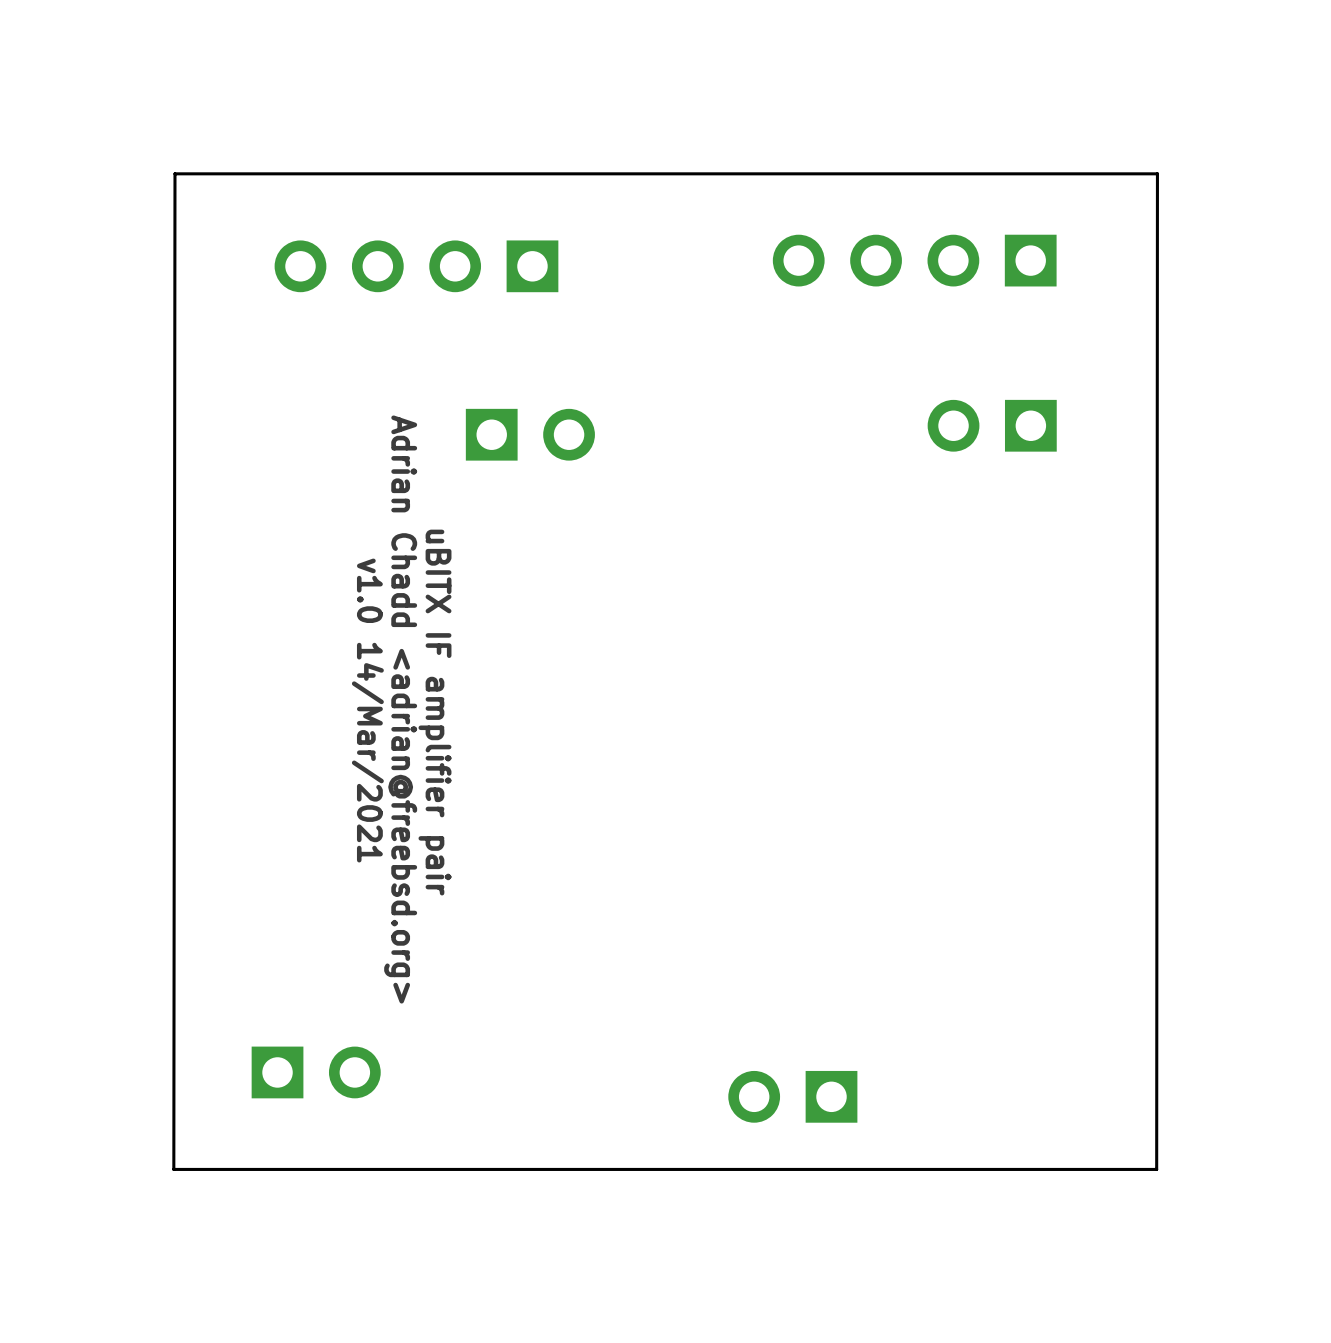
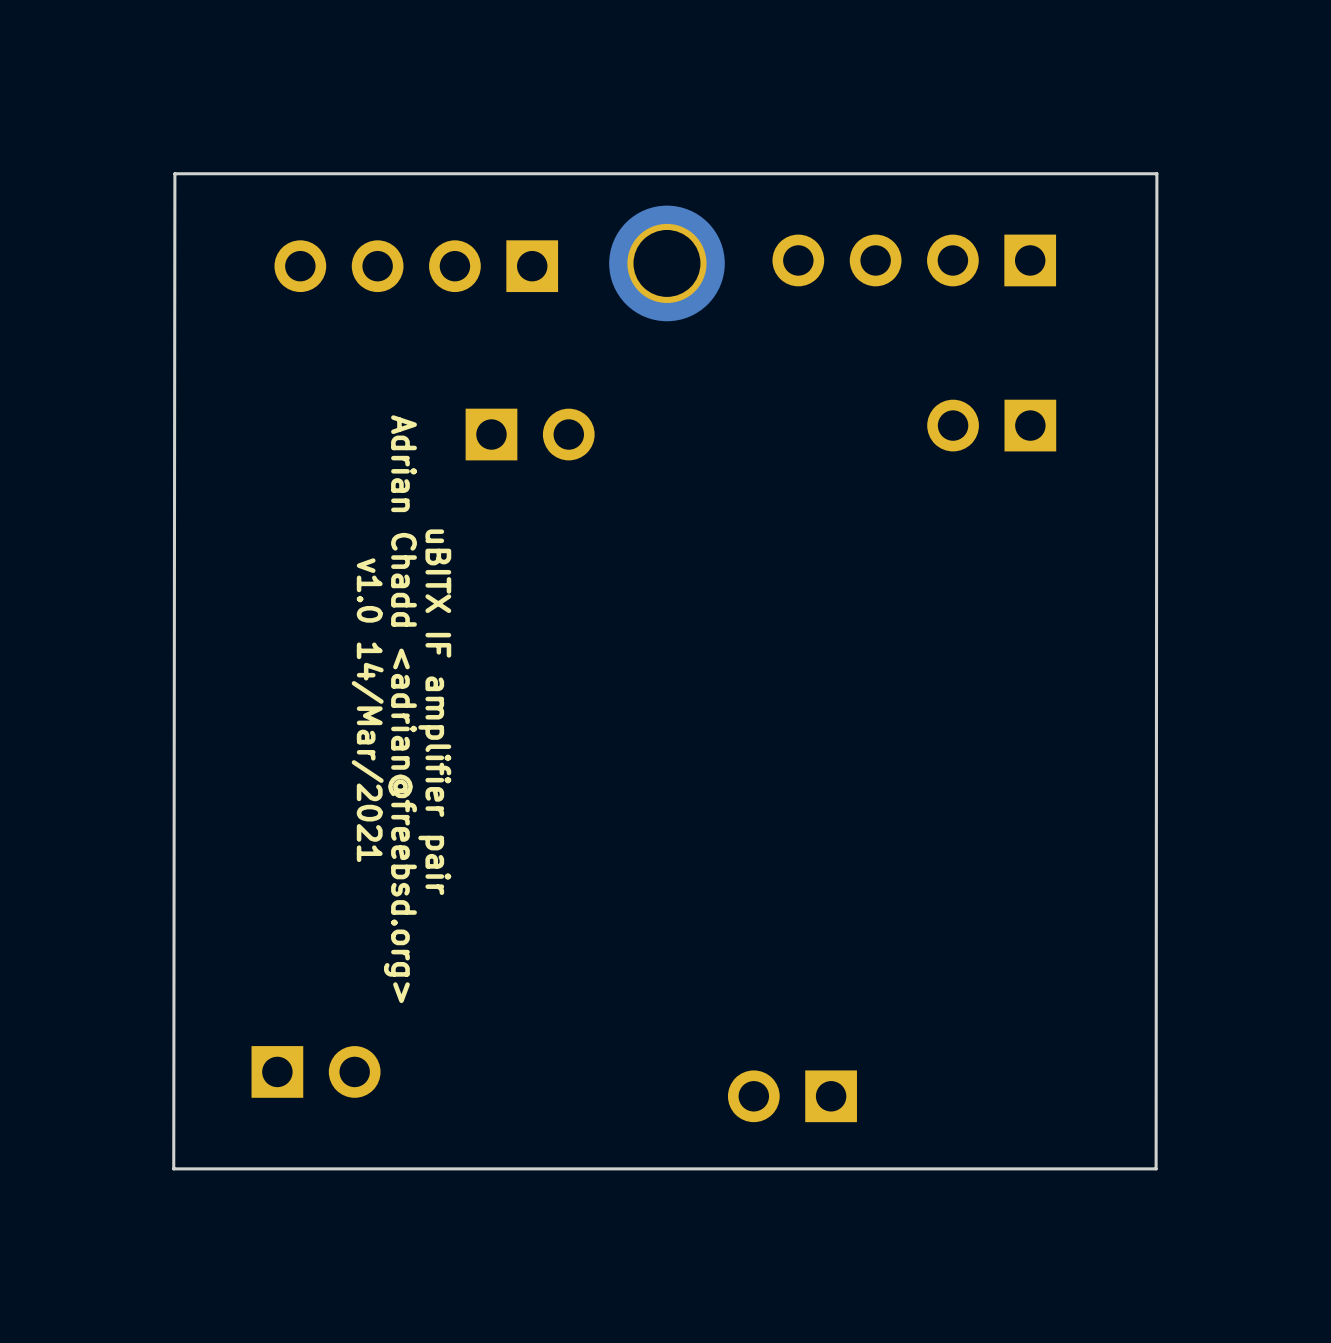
part: none -> (666, 263)

